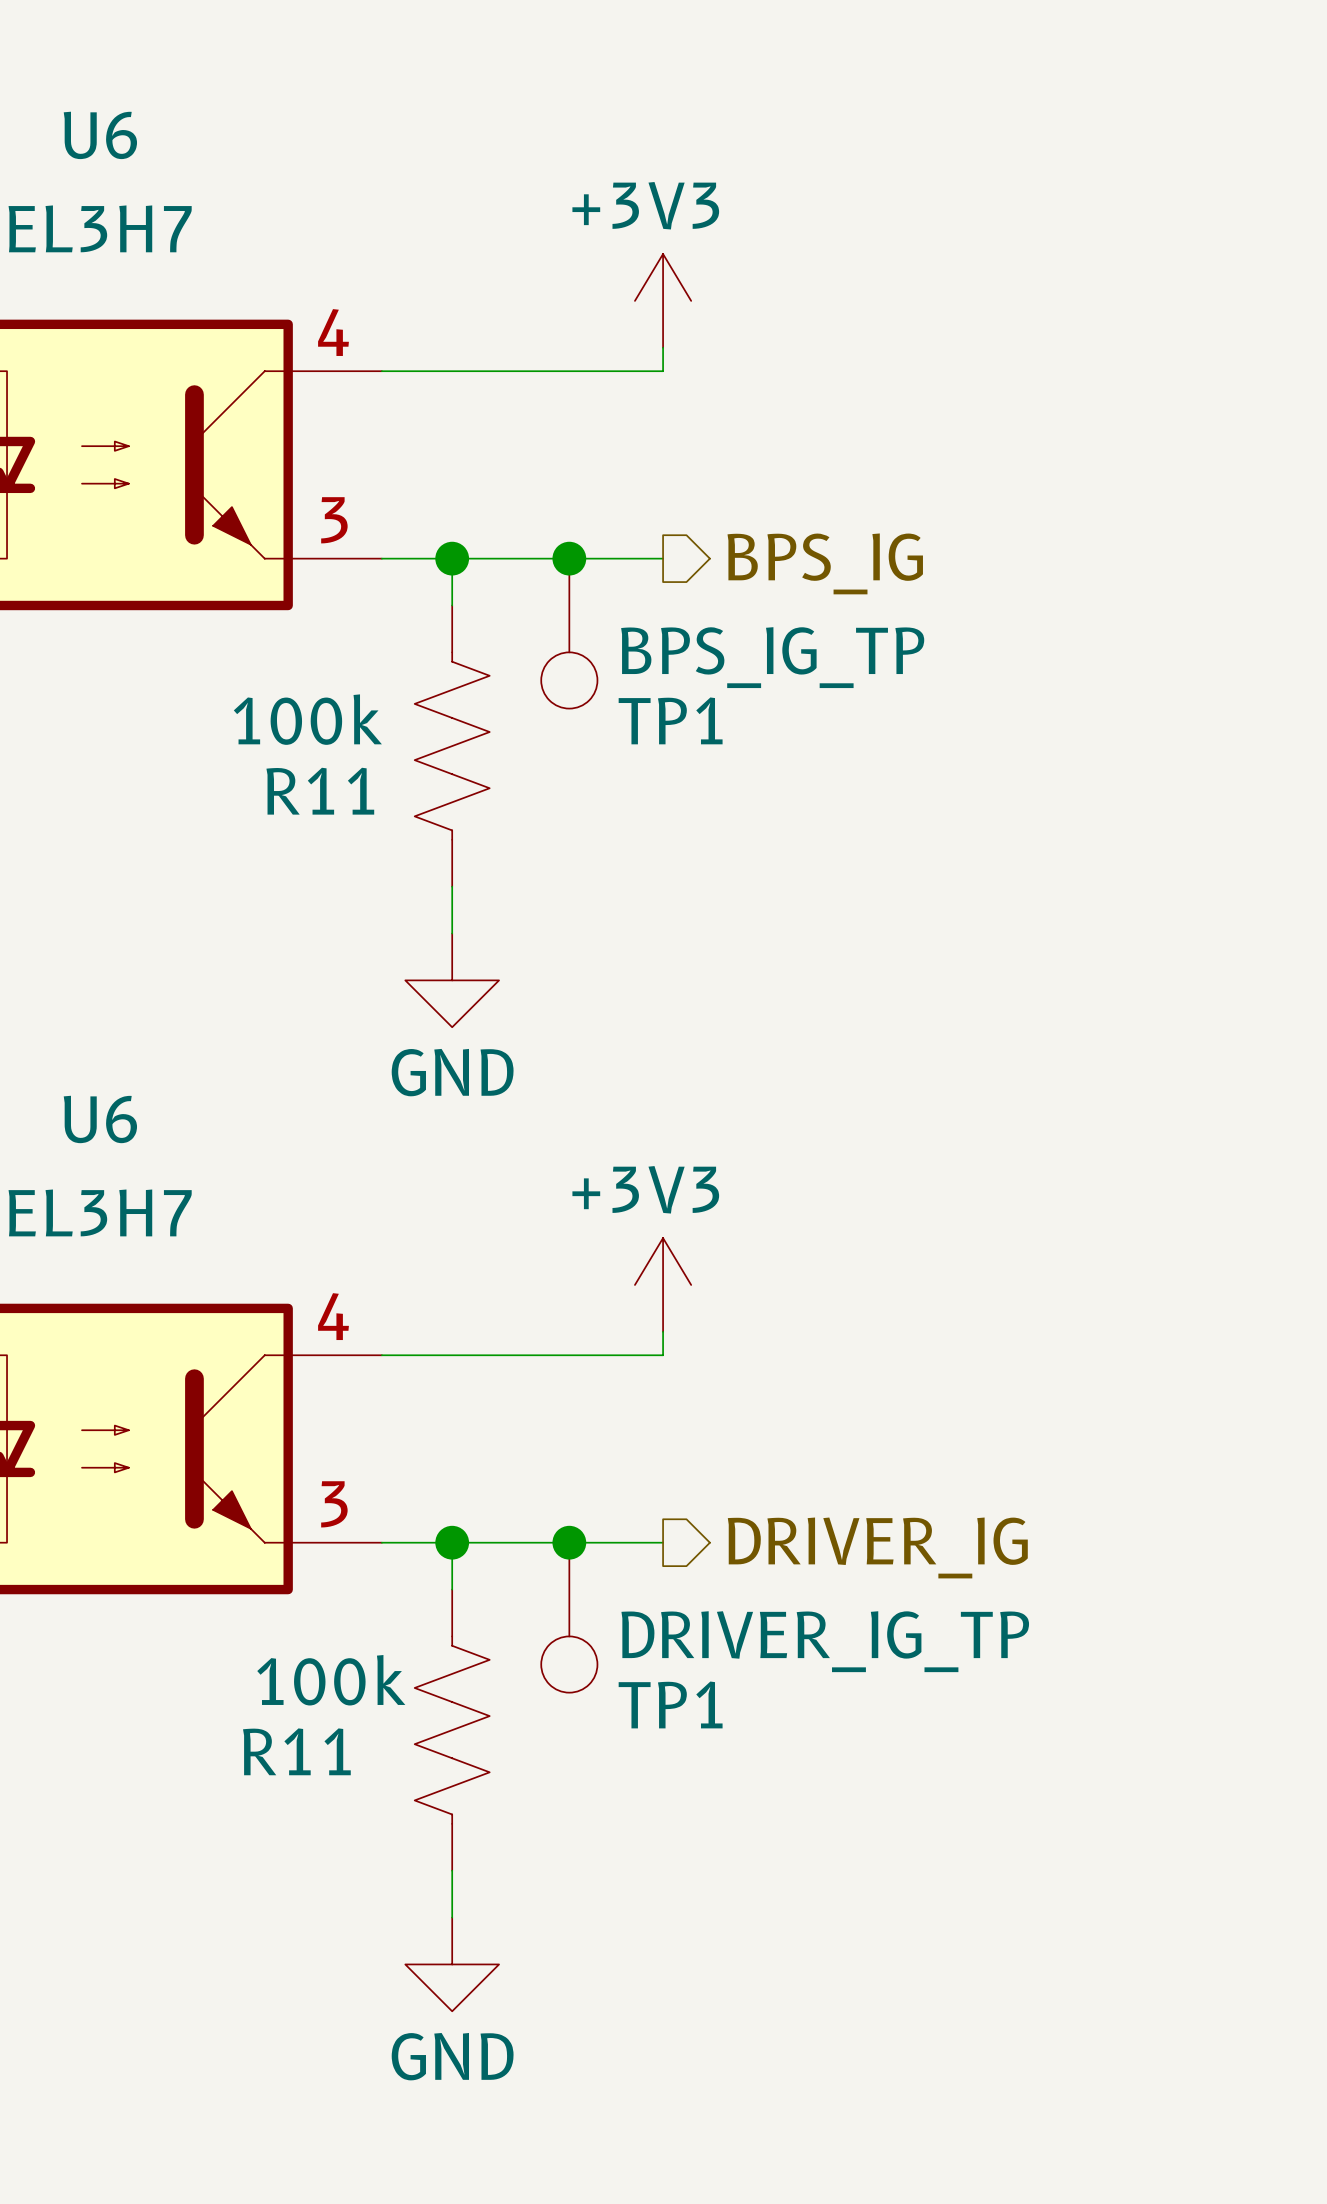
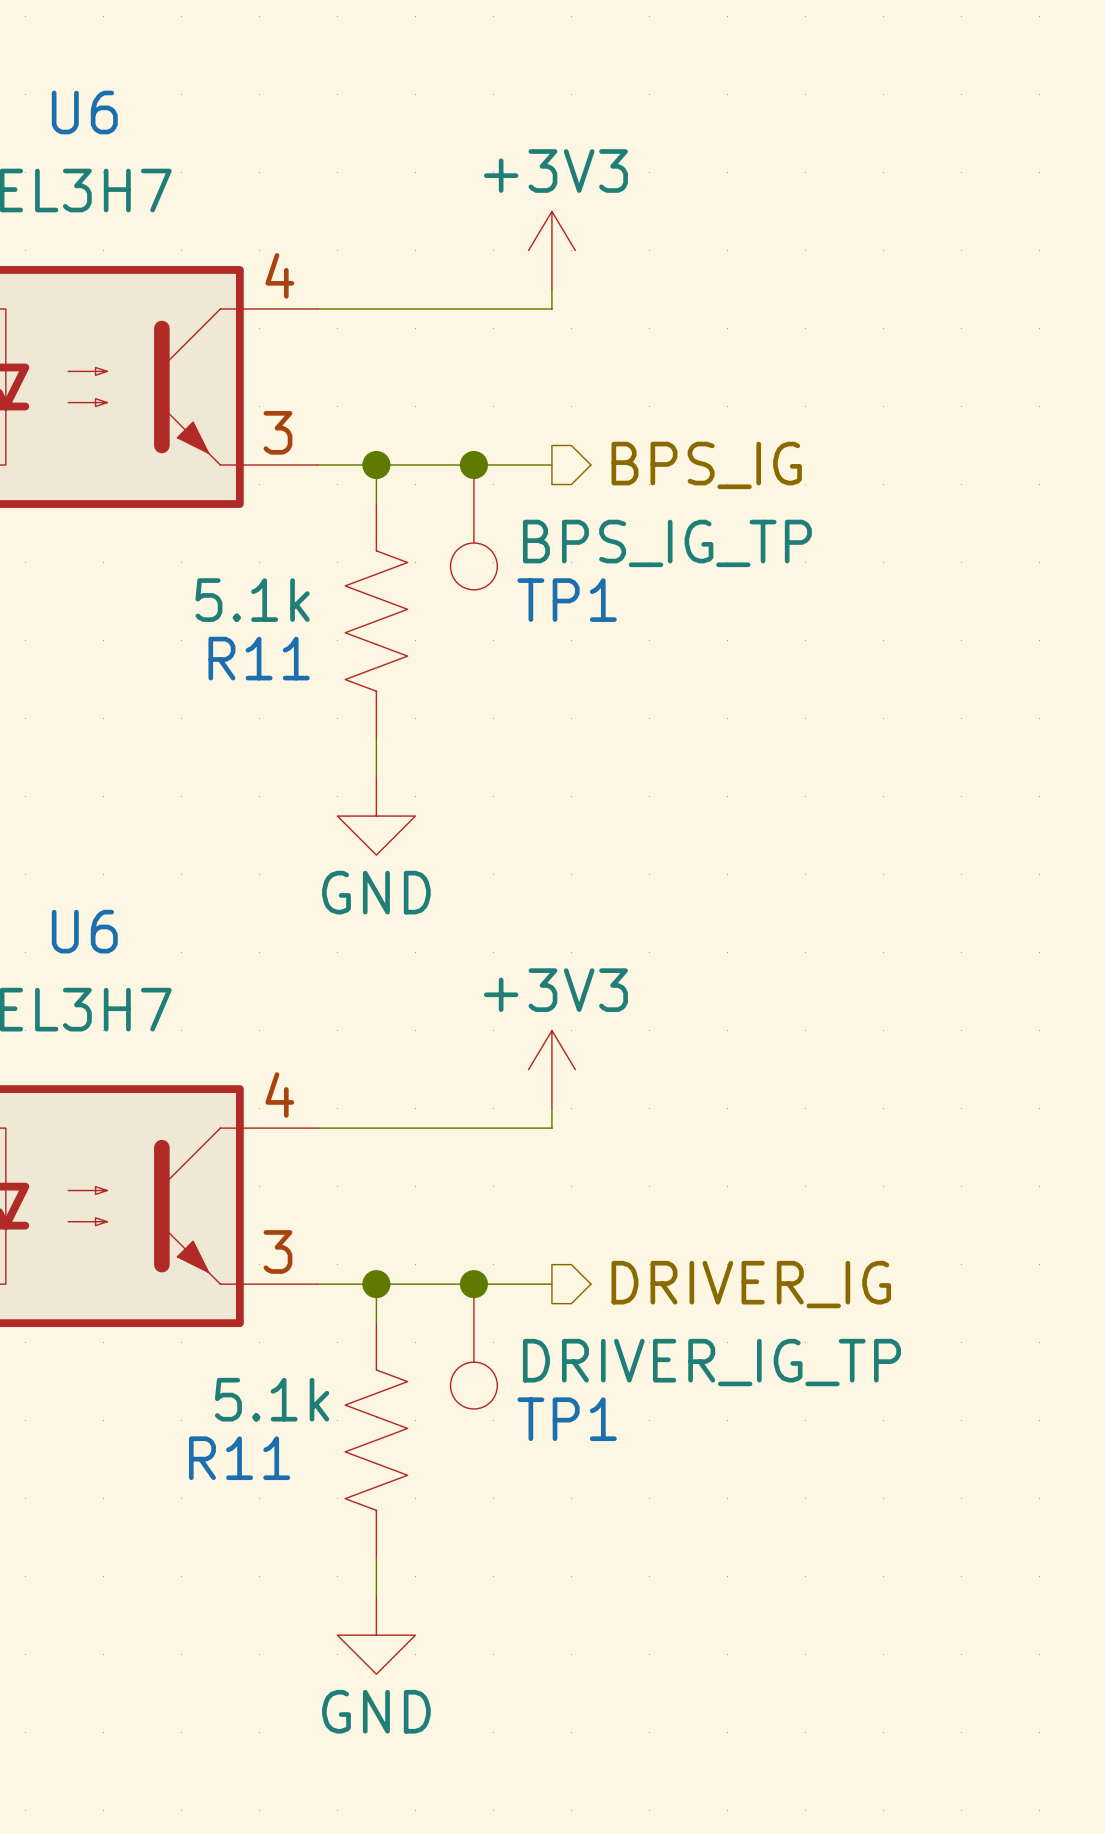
R11 value: 100k (307, 719) -> 5.1k (252, 600)
R11 value: 100k (331, 1680) -> 5.1k (272, 1399)

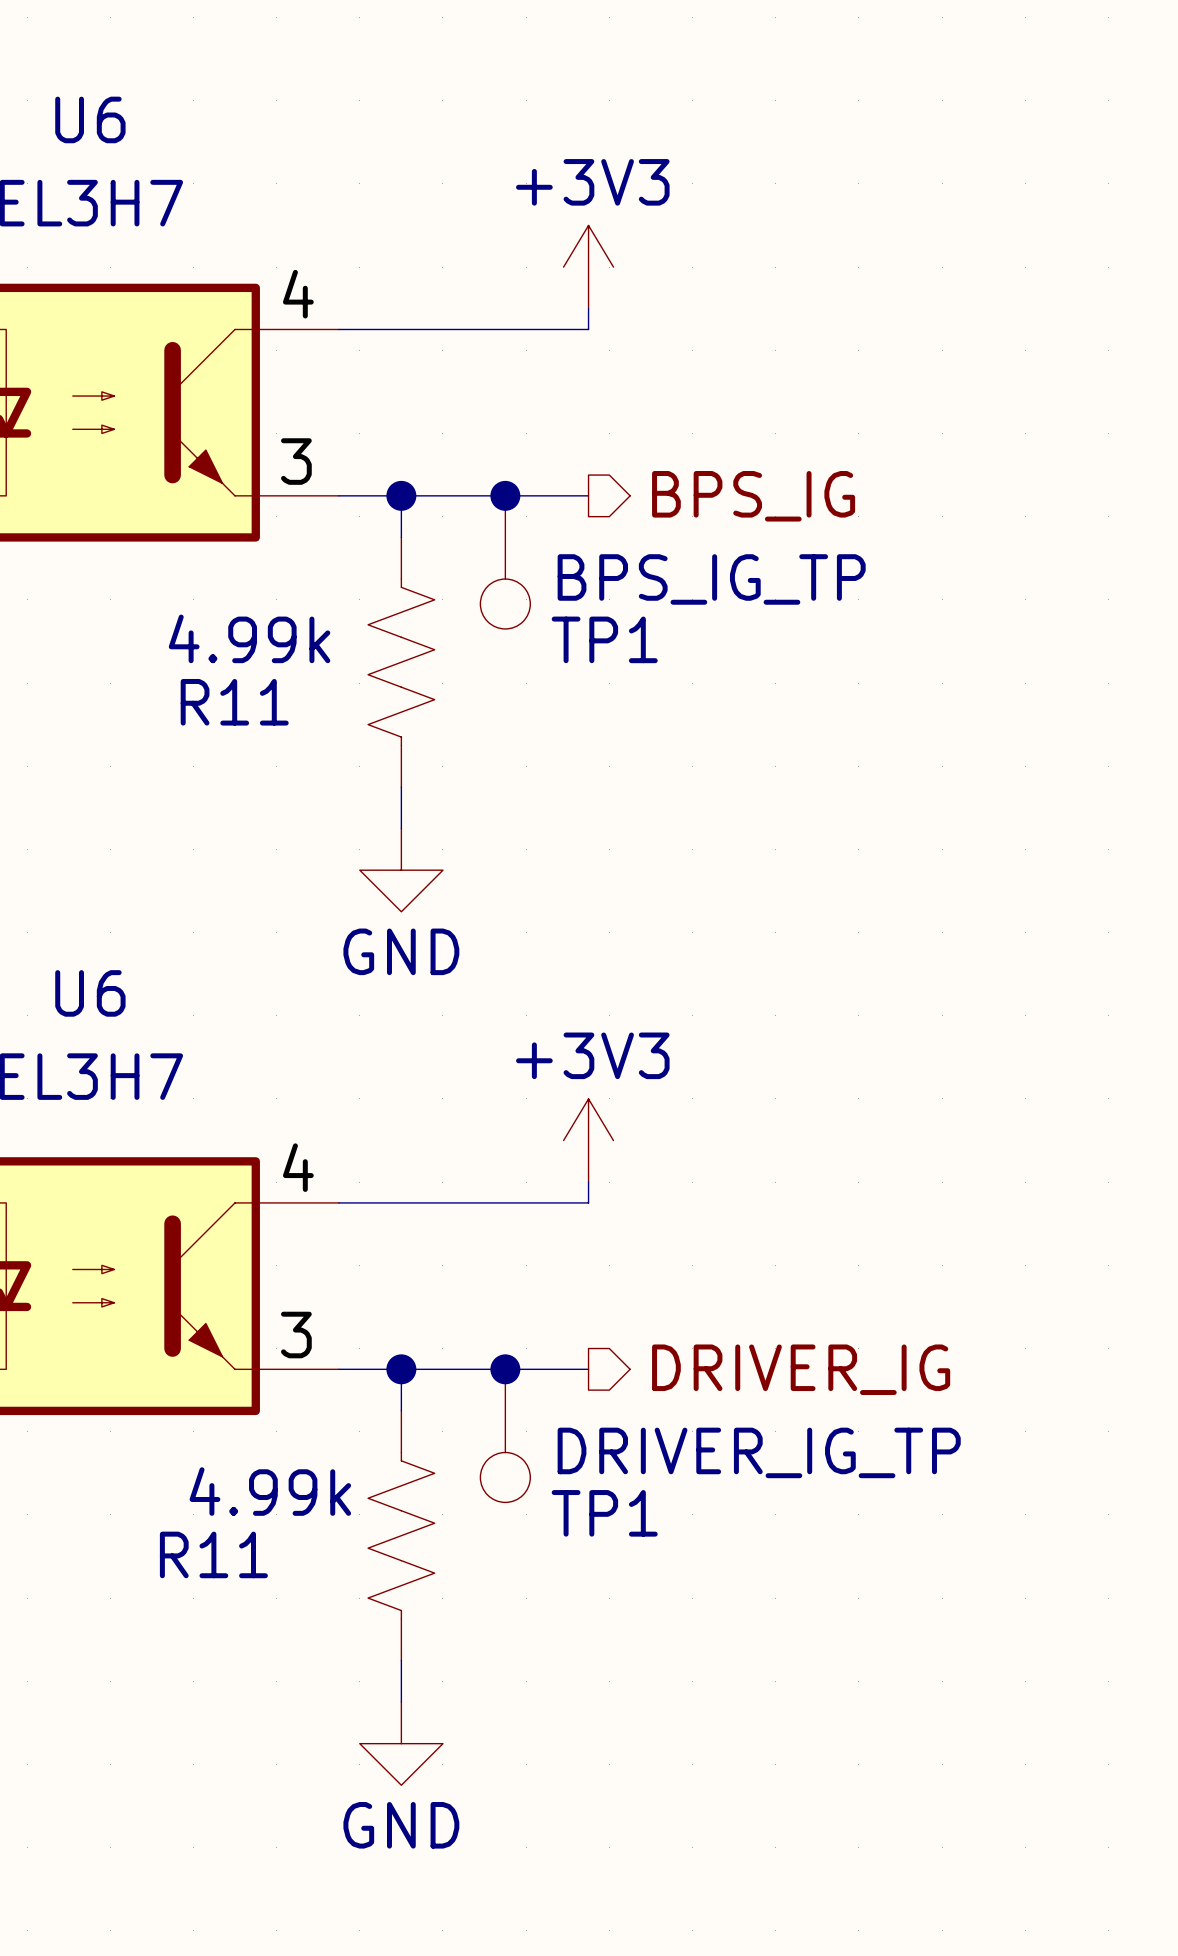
R11 value: 5.1k (252, 600) -> 4.99k (249, 638)
R11 name position: R11 (259, 658) -> R11 (234, 702)
R11 value: 5.1k (272, 1399) -> 4.99k (270, 1491)
R11 name position: R11 (239, 1458) -> R11 (213, 1554)

